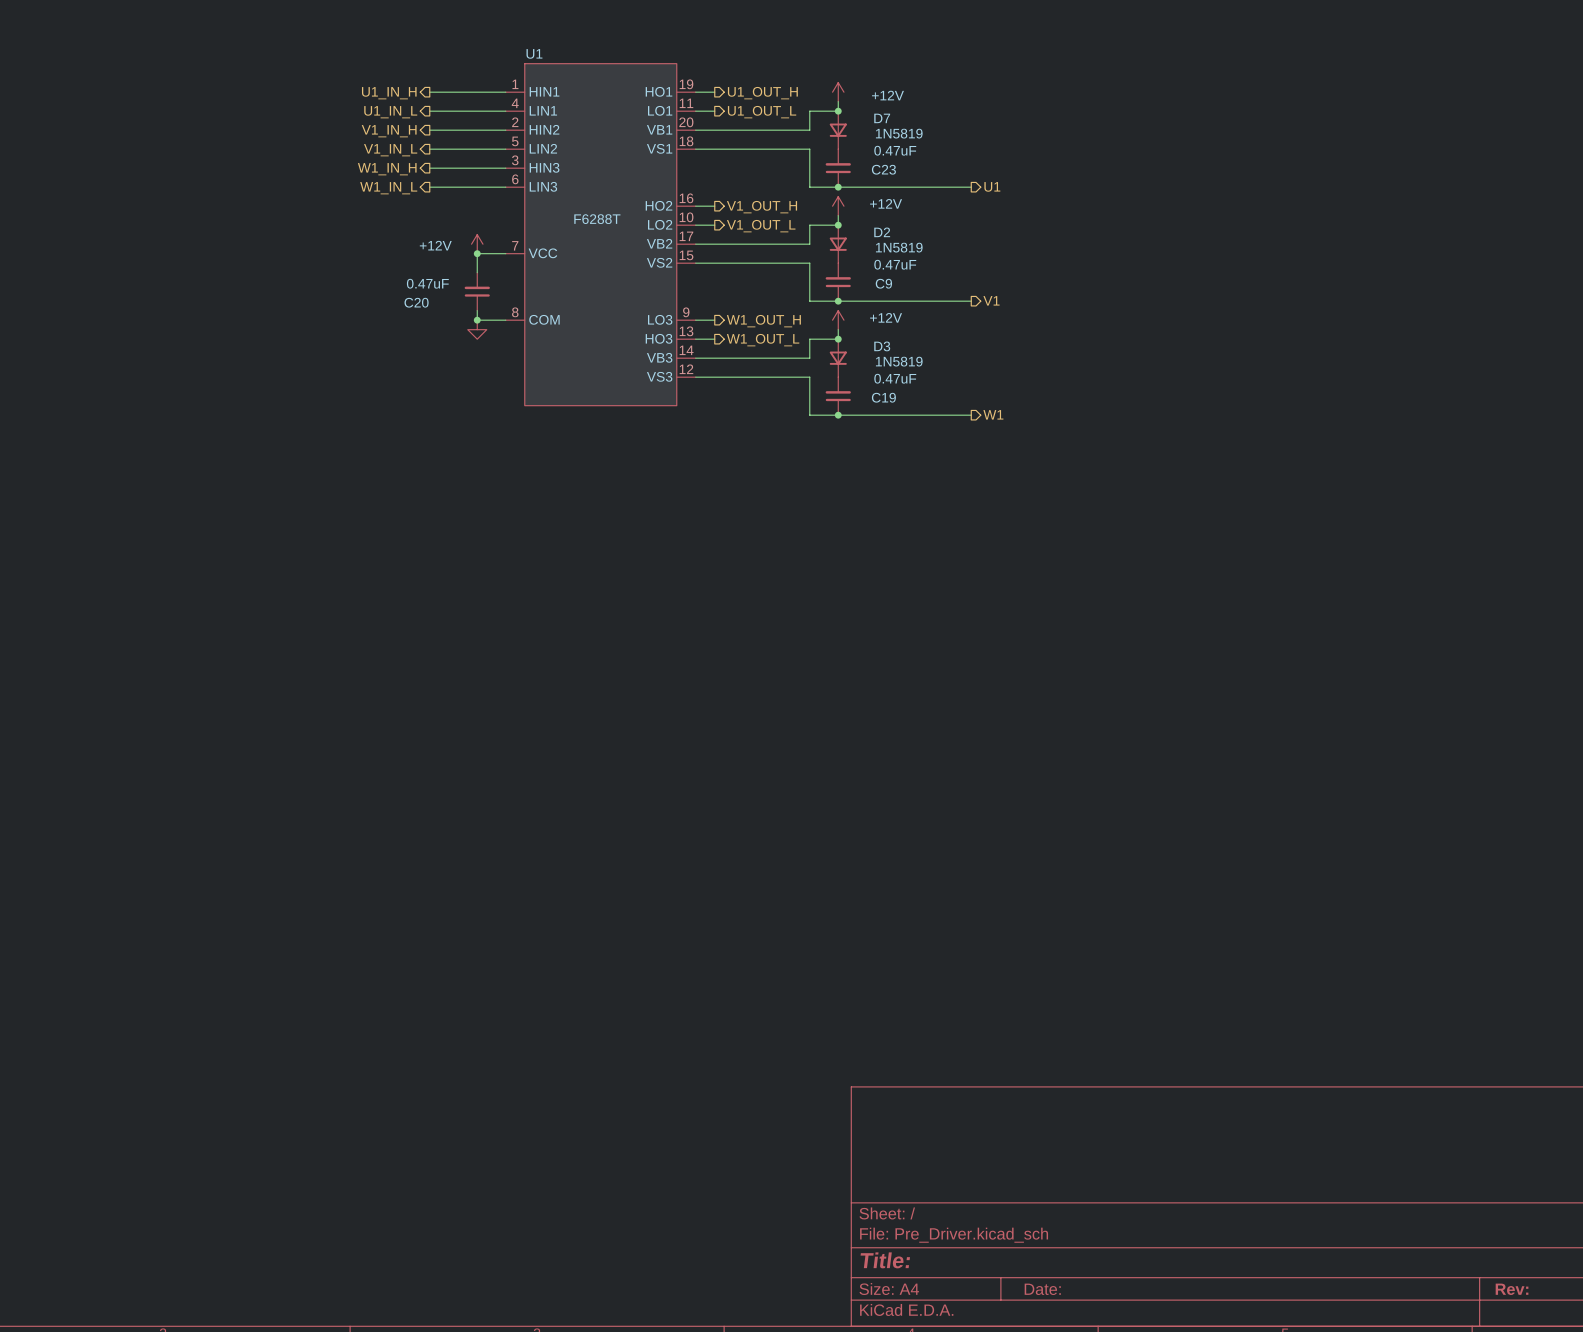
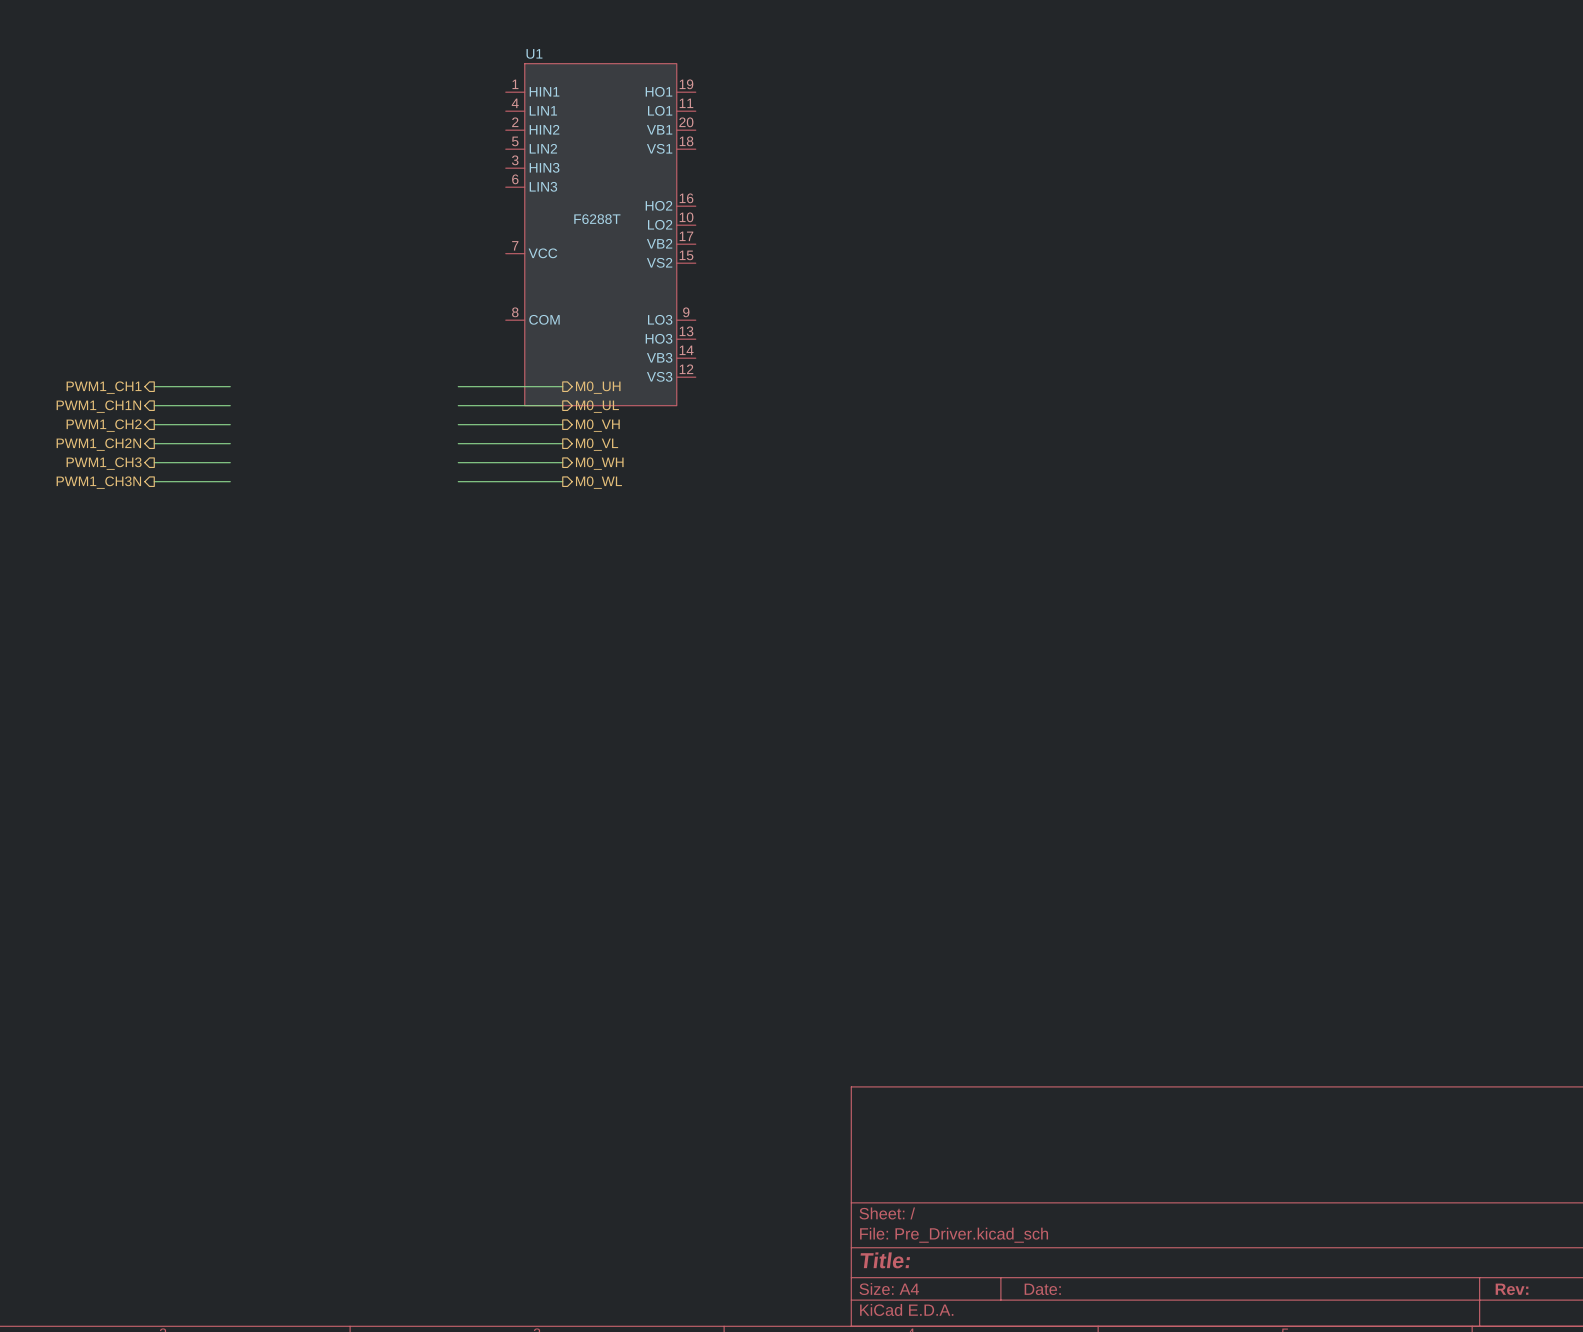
wire: (429, 92) (505, 92) -> none
wire: (695, 92) (714, 92) -> none
power symbol: +12V (838, 92) -> none
hierarchical label: U1_IN_H (389, 93) -> none
hierarchical label: U1_OUT_H (762, 93) -> none
wire: (838, 101) (838, 111) (809, 111) (809, 130) (695, 130) -> none
wire: (429, 111) (505, 111) -> none
wire: (695, 111) (714, 111) -> none
junction: (838, 111) -> none
hierarchical label: U1_IN_L (390, 112) -> none
hierarchical label: U1_OUT_L (762, 112) -> none
wire: (429, 130) (505, 130) -> none
D7: 1N5819 (838, 130) -> none
hierarchical label: V1_IN_H (389, 131) -> none
wire: (429, 149) (505, 149) -> none
wire: (695, 149) (809, 149) (809, 187) (971, 187) -> none
hierarchical label: V1_IN_L (390, 150) -> none
wire: (429, 168) (505, 168) -> none
C23: 0.47uF (838, 168) -> none
hierarchical label: W1_IN_H (387, 169) -> none
hierarchical label: U1 (992, 186) -> none
wire: (429, 187) (505, 187) -> none
junction: (838, 187) -> none
hierarchical label: W1_IN_L (388, 188) -> none
wire: (695, 206) (714, 206) -> none
power symbol: +12V (838, 206) -> none
hierarchical label: V1_OUT_H (761, 207) -> none
wire: (838, 215) (838, 225) (809, 225) (809, 244) (695, 244) -> none
wire: (695, 225) (714, 225) -> none
junction: (838, 225) -> none
hierarchical label: V1_OUT_L (761, 226) -> none
power symbol: +12V (477, 244) -> none
D2: 1N5819 (838, 244) -> none
junction: (477, 253) -> none
wire: (505, 253) (477, 253) (477, 272) -> none
wire: (695, 263) (809, 263) (809, 301) (971, 301) -> none
C9: 0.47uF (838, 282) -> none
C20: 0.47uF (477, 291) -> none
hierarchical label: V1 (991, 300) -> none
junction: (838, 301) -> none
wire: (477, 310) (477, 320) (505, 320) -> none
junction: (477, 320) -> none
wire: (695, 320) (714, 320) -> none
power symbol: +12V (838, 320) -> none
hierarchical label: W1_OUT_H (763, 321) -> none
power symbol: (477, 329) -> none
wire: (838, 329) (838, 339) (809, 339) (809, 358) (695, 358) -> none
wire: (695, 339) (714, 339) -> none
junction: (838, 339) -> none
hierarchical label: W1_OUT_L (763, 340) -> none
D3: 1N5819 (838, 358) -> none
wire: (695, 377) (809, 377) (809, 415) (971, 415) -> none
wire: none -> (154, 386) (230, 386)
wire: none -> (458, 386) (562, 386)
hierarchical label: none -> PWM1_CH1 (104, 387)
hierarchical label: none -> M0_UH (598, 387)
C19: 0.47uF (838, 396) -> none
wire: none -> (154, 405) (230, 405)
wire: none -> (458, 405) (562, 405)
hierarchical label: none -> PWM1_CH1N (98, 406)
hierarchical label: none -> M0_UL (597, 406)
hierarchical label: W1 (993, 414) -> none
junction: (838, 415) -> none
wire: none -> (154, 424) (230, 424)
wire: none -> (458, 424) (562, 424)
hierarchical label: none -> PWM1_CH2 (104, 425)
hierarchical label: none -> M0_VH (597, 425)
wire: none -> (154, 443) (230, 443)
wire: none -> (458, 443) (562, 443)
hierarchical label: none -> PWM1_CH2N (98, 444)
hierarchical label: none -> M0_VL (597, 444)
wire: none -> (154, 462) (230, 462)
wire: none -> (458, 462) (562, 462)
hierarchical label: none -> PWM1_CH3 (104, 463)
hierarchical label: none -> M0_WH (599, 463)
wire: none -> (154, 481) (230, 481)
wire: none -> (458, 481) (562, 481)
hierarchical label: none -> PWM1_CH3N (98, 482)
hierarchical label: none -> M0_WL (598, 482)

